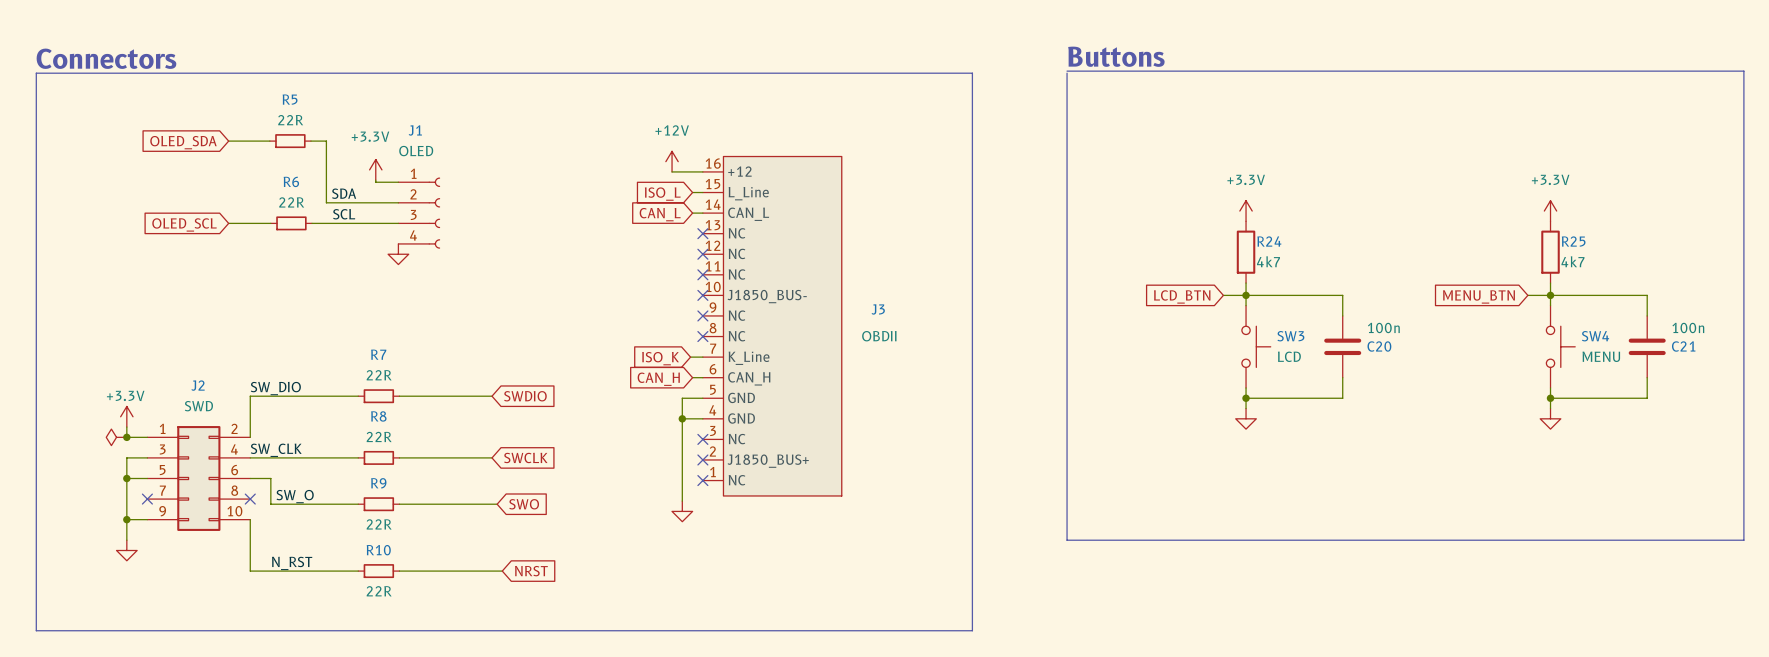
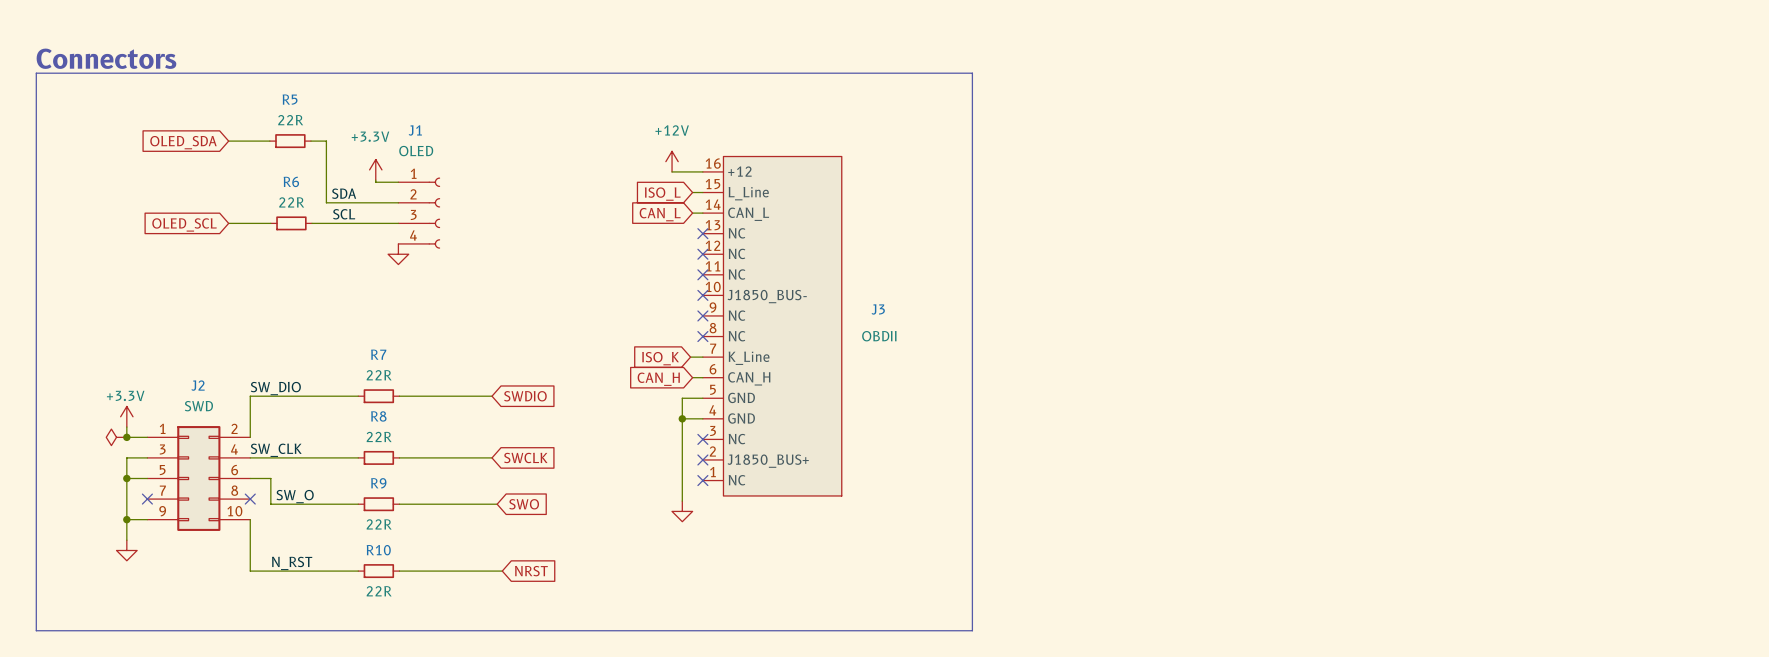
text: Buttons (1116, 56) -> none
line: (1067, 71) (1743, 71) (1743, 540) (1067, 540) (1067, 73) -> none
power symbol: +3.3V (1246, 211) -> none
power symbol: +3.3V (1550, 211) -> none
R24: 4k7 (1246, 252) -> none
R25: 4k7 (1550, 252) -> none
wire: (1246, 283) (1246, 305) -> none
wire: (1550, 283) (1550, 305) -> none
wire: (1223, 295) (1342, 295) (1342, 315) -> none
junction: (1246, 295) -> none
wire: (1527, 295) (1647, 295) (1647, 315) -> none
junction: (1550, 295) -> none
global label: LCD_BTN (1182, 296) -> none
global label: MENU_BTN (1478, 296) -> none
SW3: LCD (1256, 346) -> none
C20: 100n (1342, 346) -> none
SW4: MENU (1560, 346) -> none
C21: 100n (1647, 346) -> none
wire: (1342, 377) (1342, 398) (1246, 398) -> none
wire: (1647, 377) (1647, 398) (1550, 398) -> none
wire: (1246, 387) (1246, 408) -> none
wire: (1550, 387) (1550, 408) -> none
junction: (1246, 398) -> none
junction: (1550, 398) -> none
power symbol: (1246, 418) -> none
power symbol: (1550, 418) -> none

